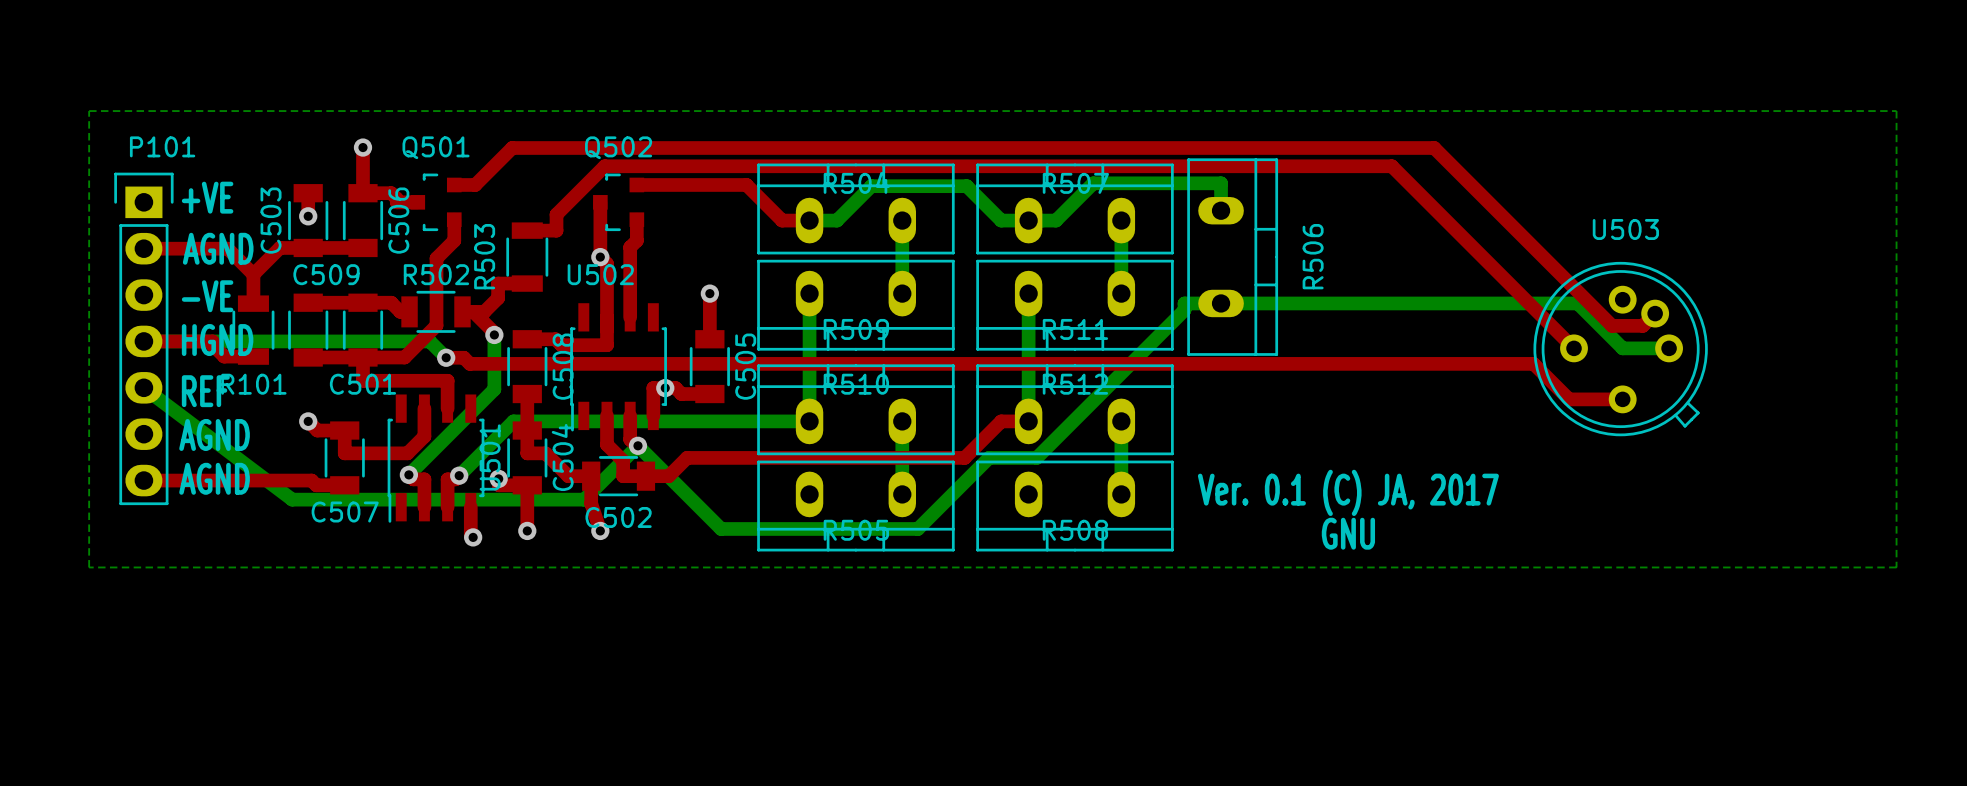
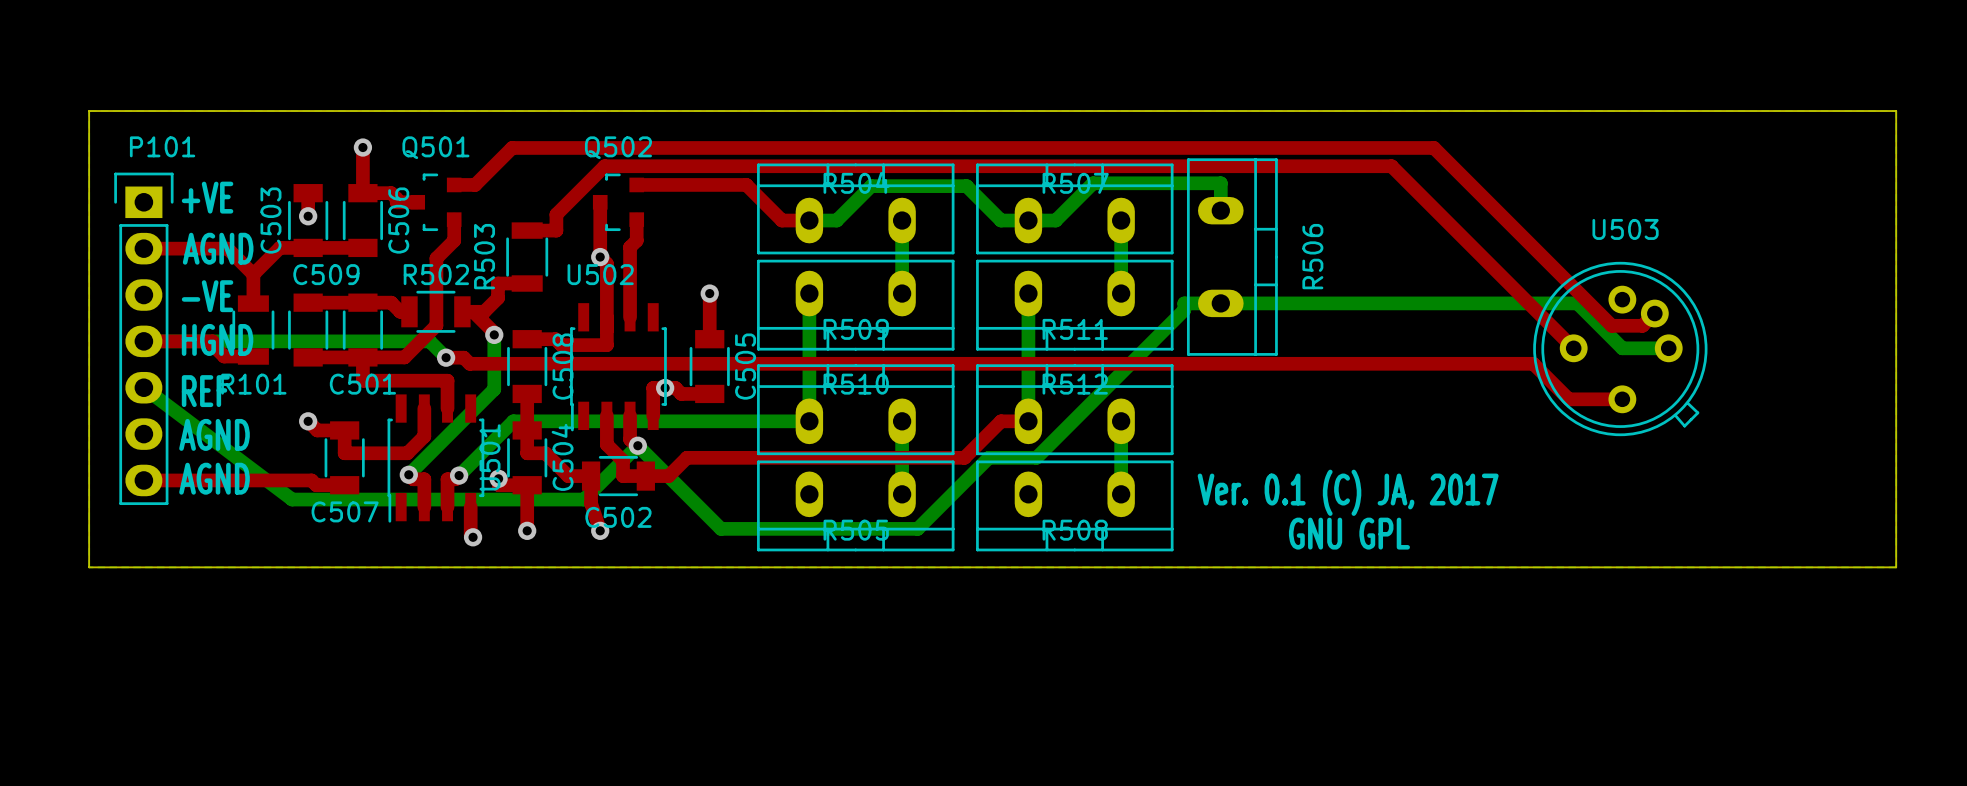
board edge: none -> (89, 111) (89, 567) (1896, 567) (1896, 111) (89, 111)
text: GNU (1348, 533) -> GNU GPL (1349, 533)

